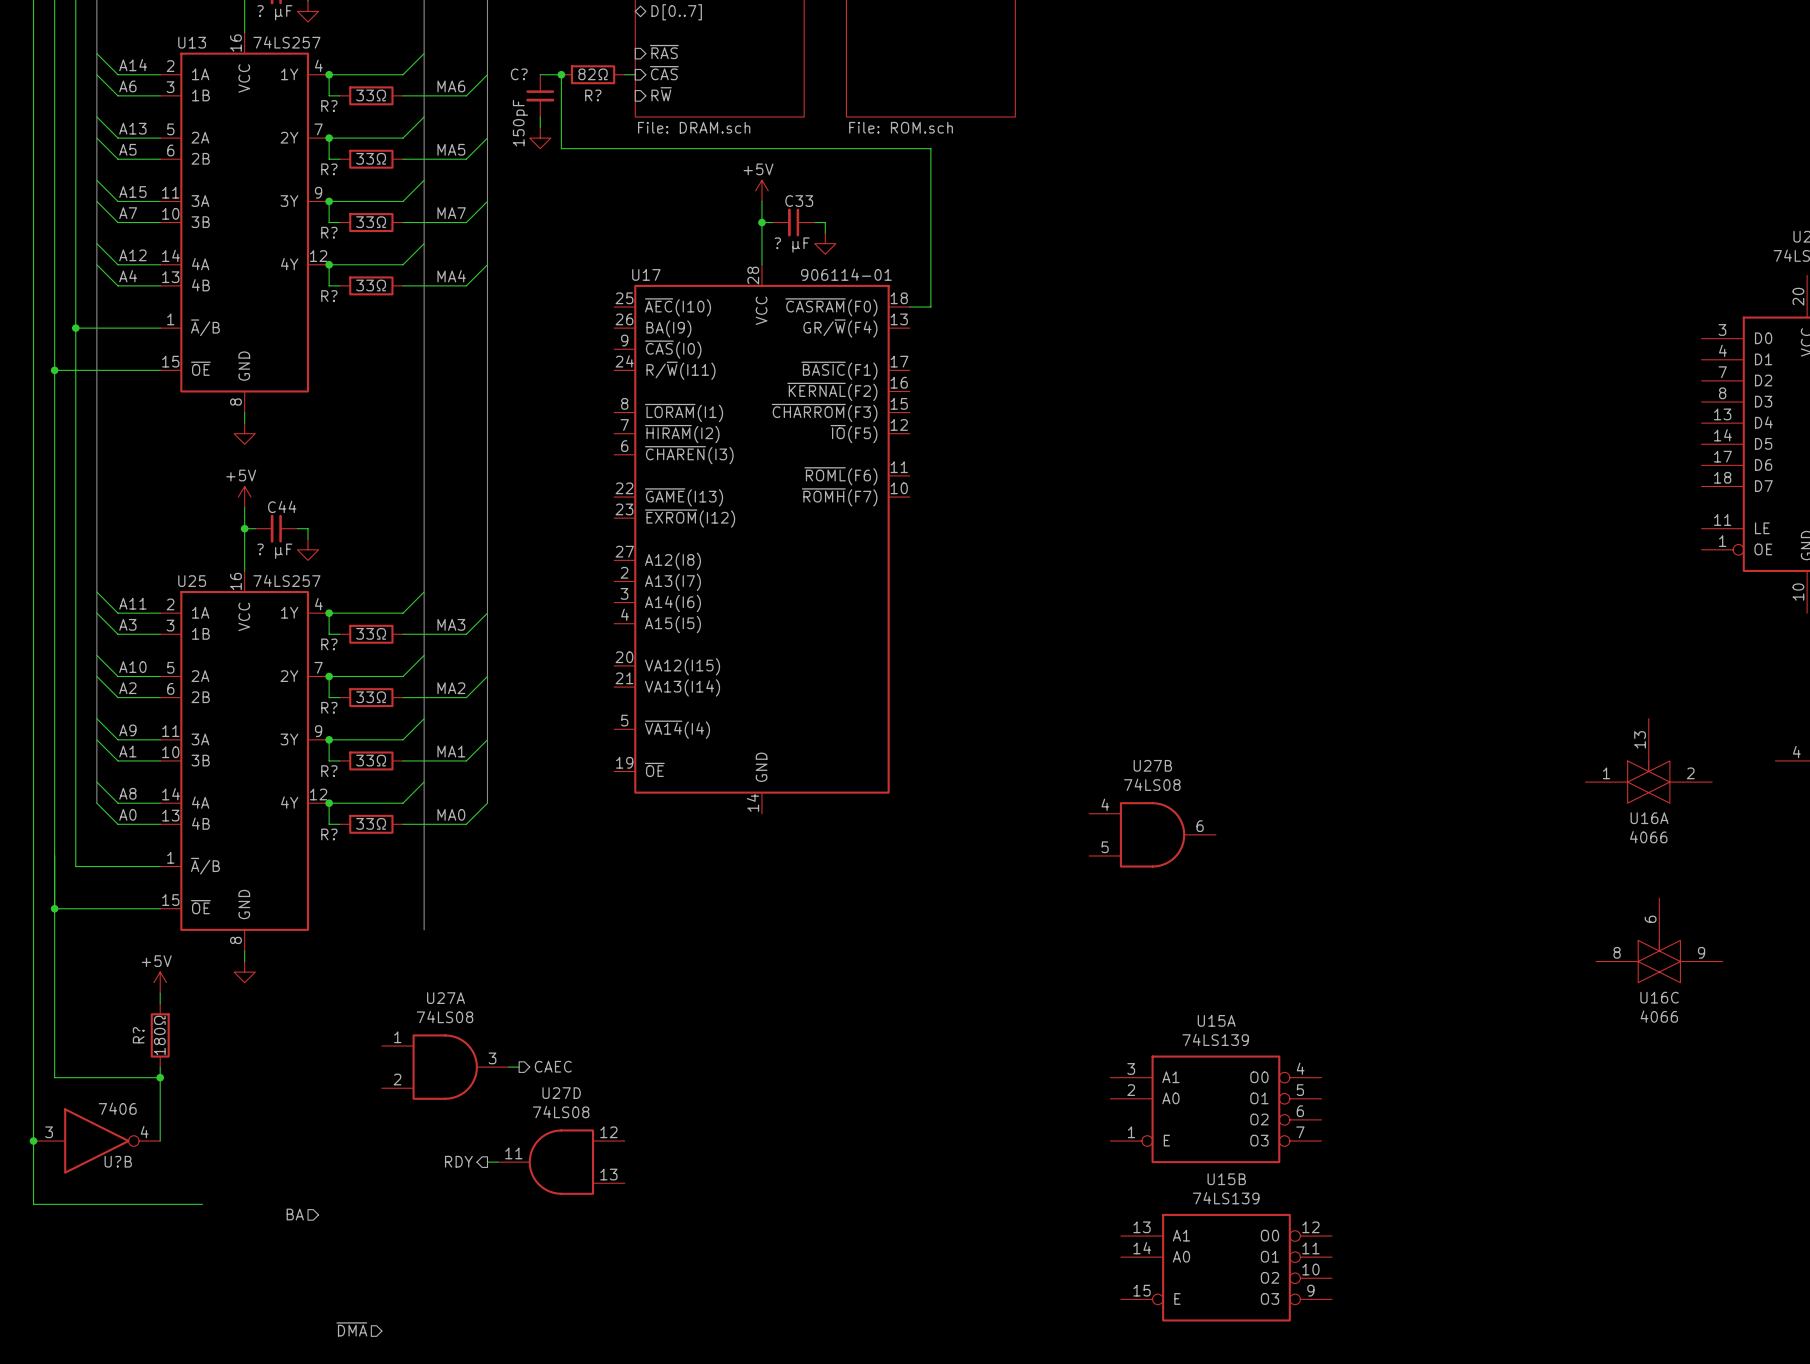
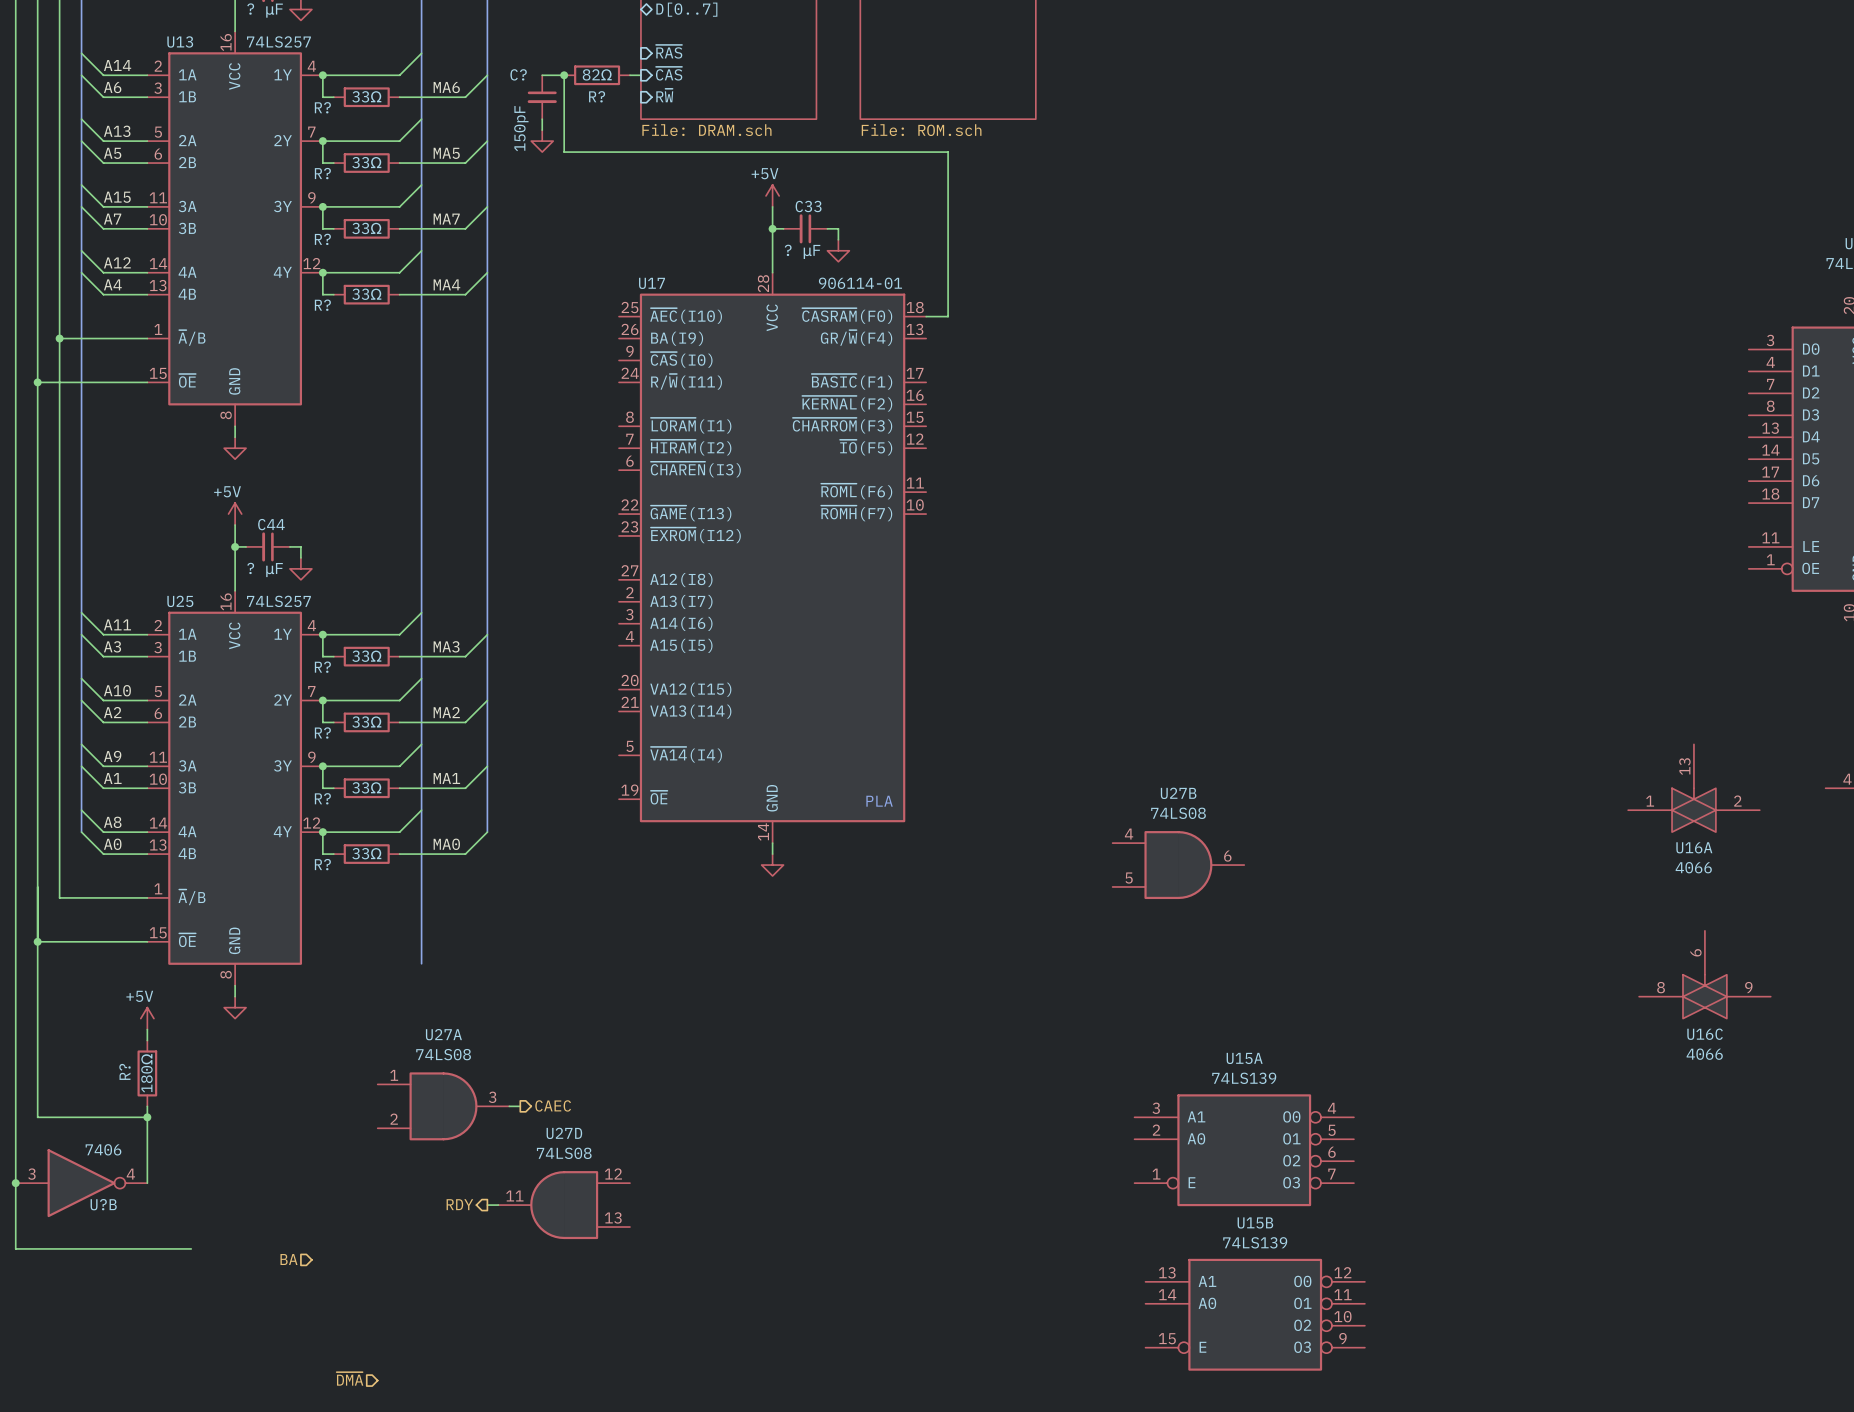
text: none -> PLA (879, 801)
wire: none -> (772, 843) (772, 854)
power symbol: none -> (772, 865)

